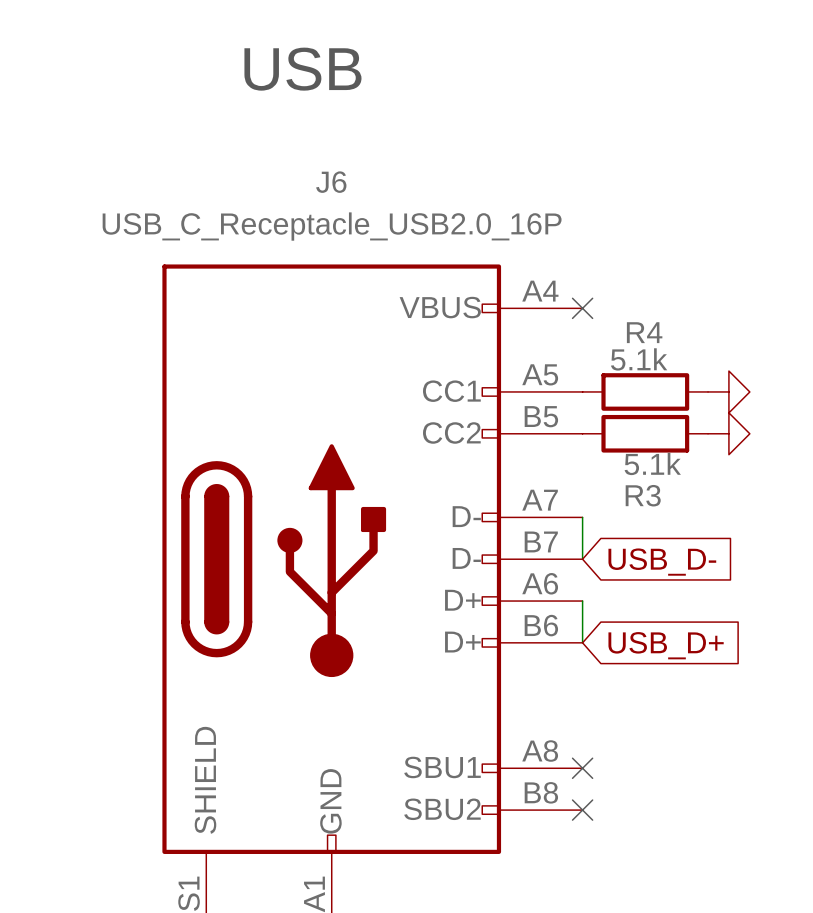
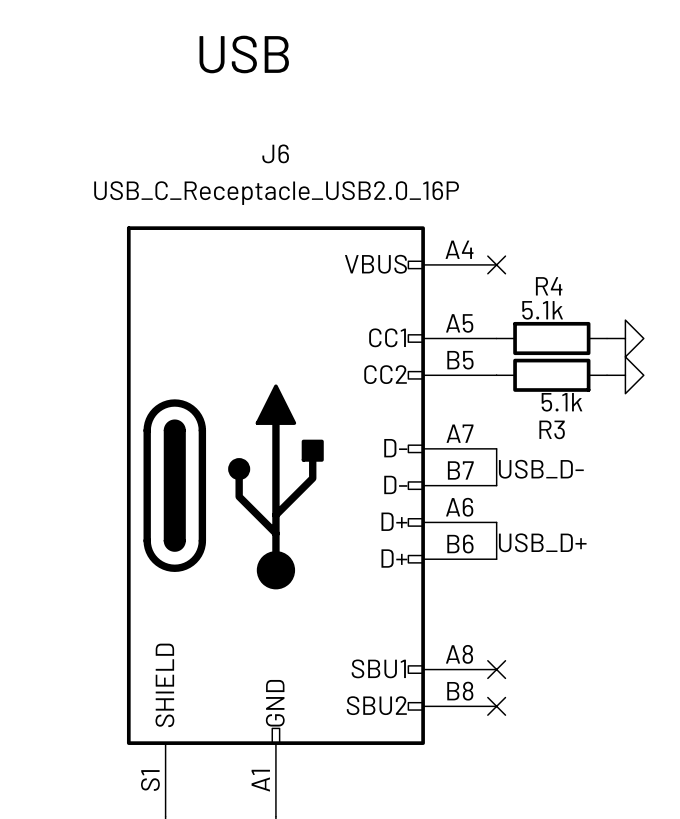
label: none -> USB_D- (541, 469)
global label: USB_D- (662, 562) -> none
label: none -> USB_D+ (542, 542)
global label: USB_D+ (666, 645) -> none

